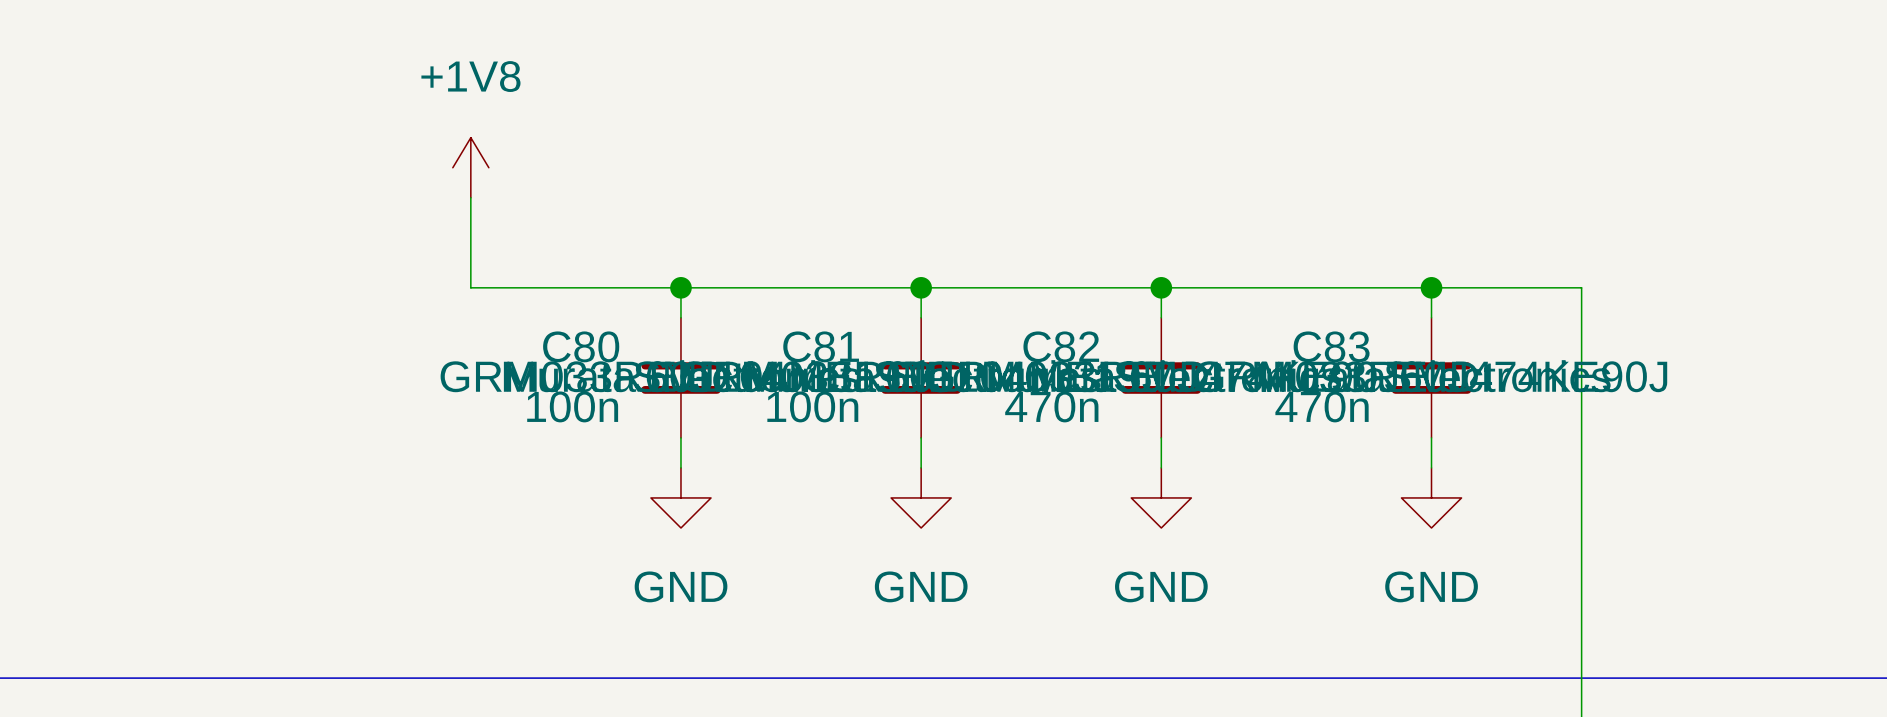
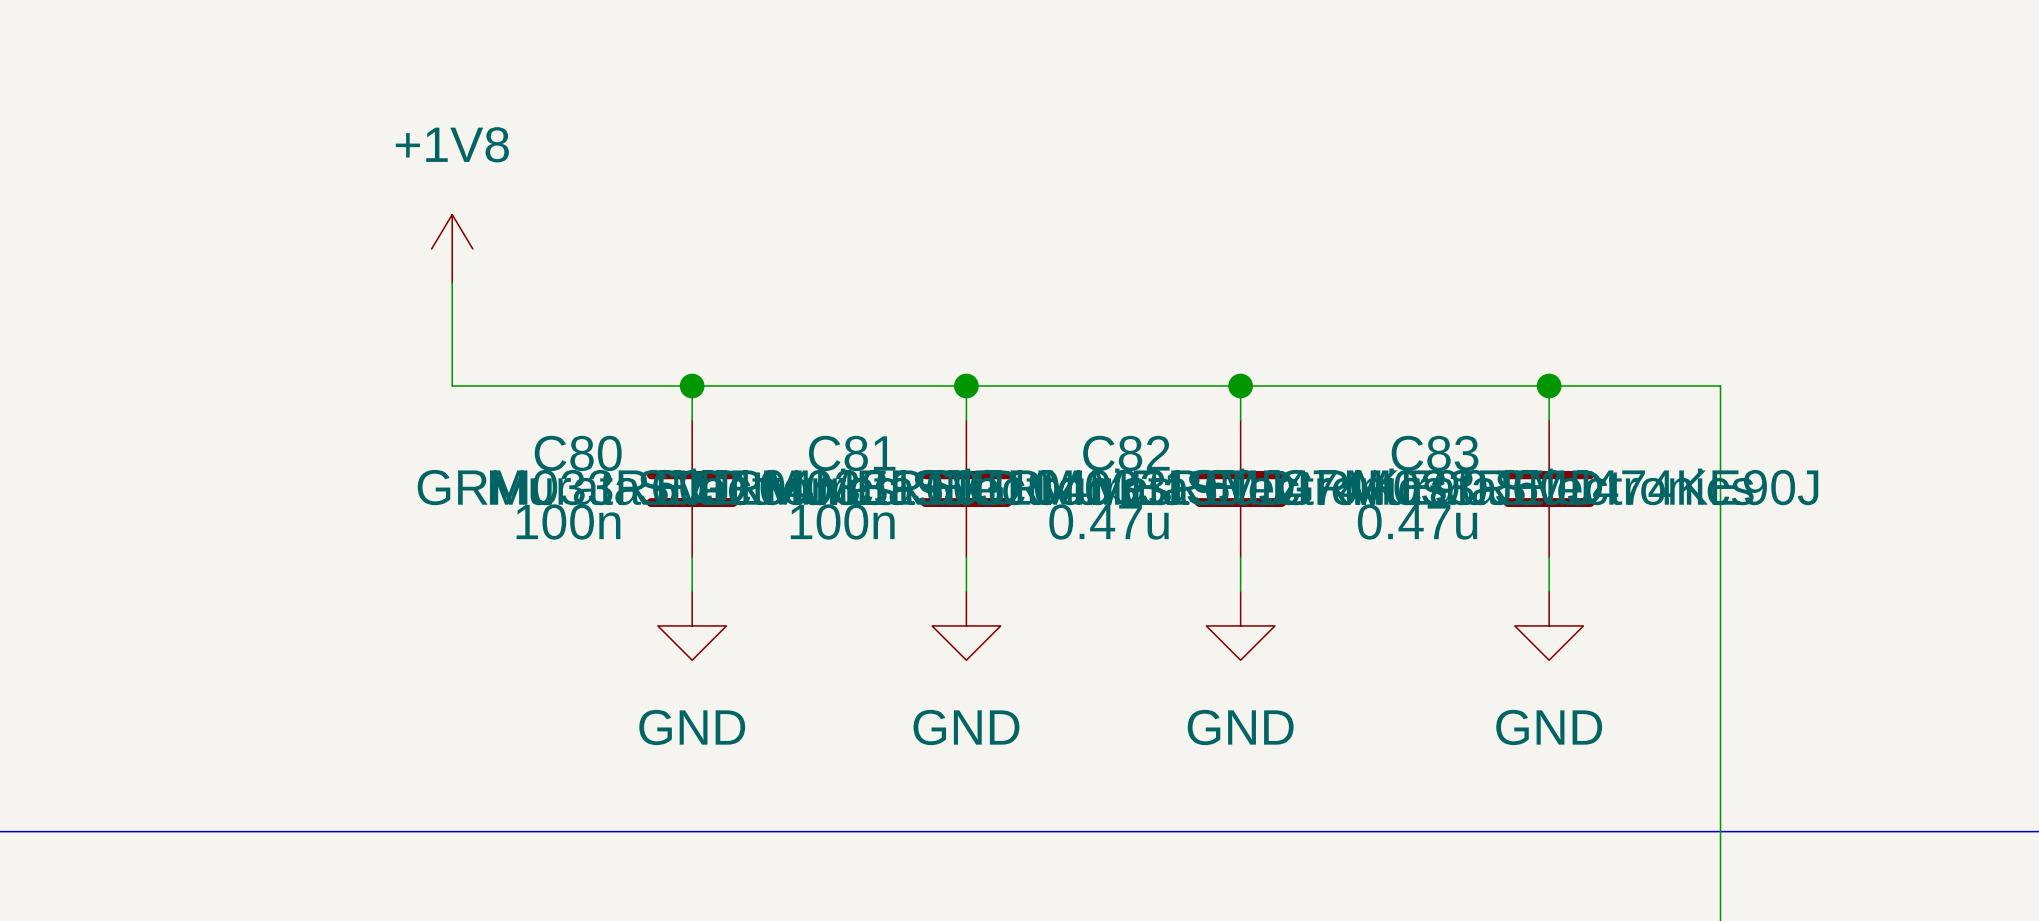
C82 value: 470n (1051, 406) -> 0.47u (1109, 521)
C83 value: 470n (1322, 406) -> 0.47u (1417, 521)

